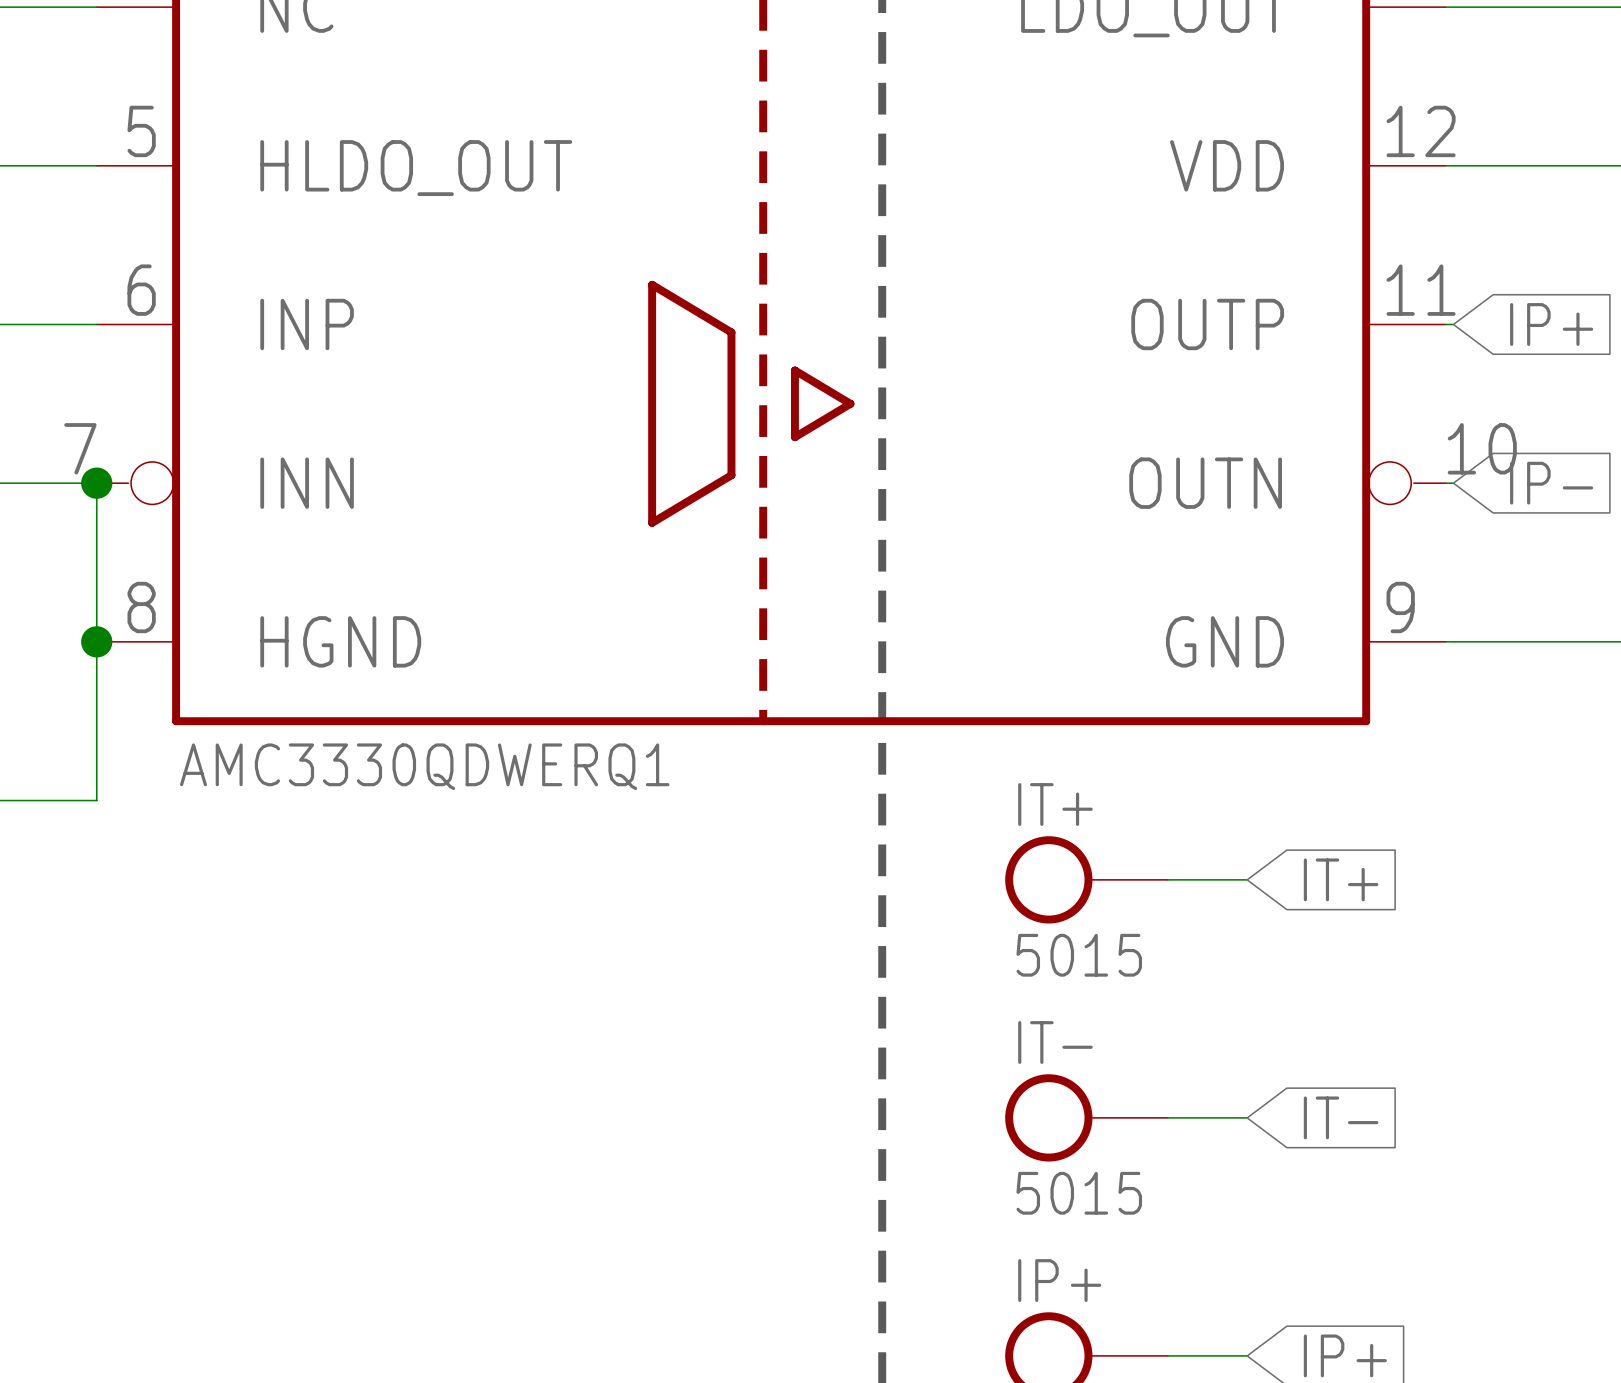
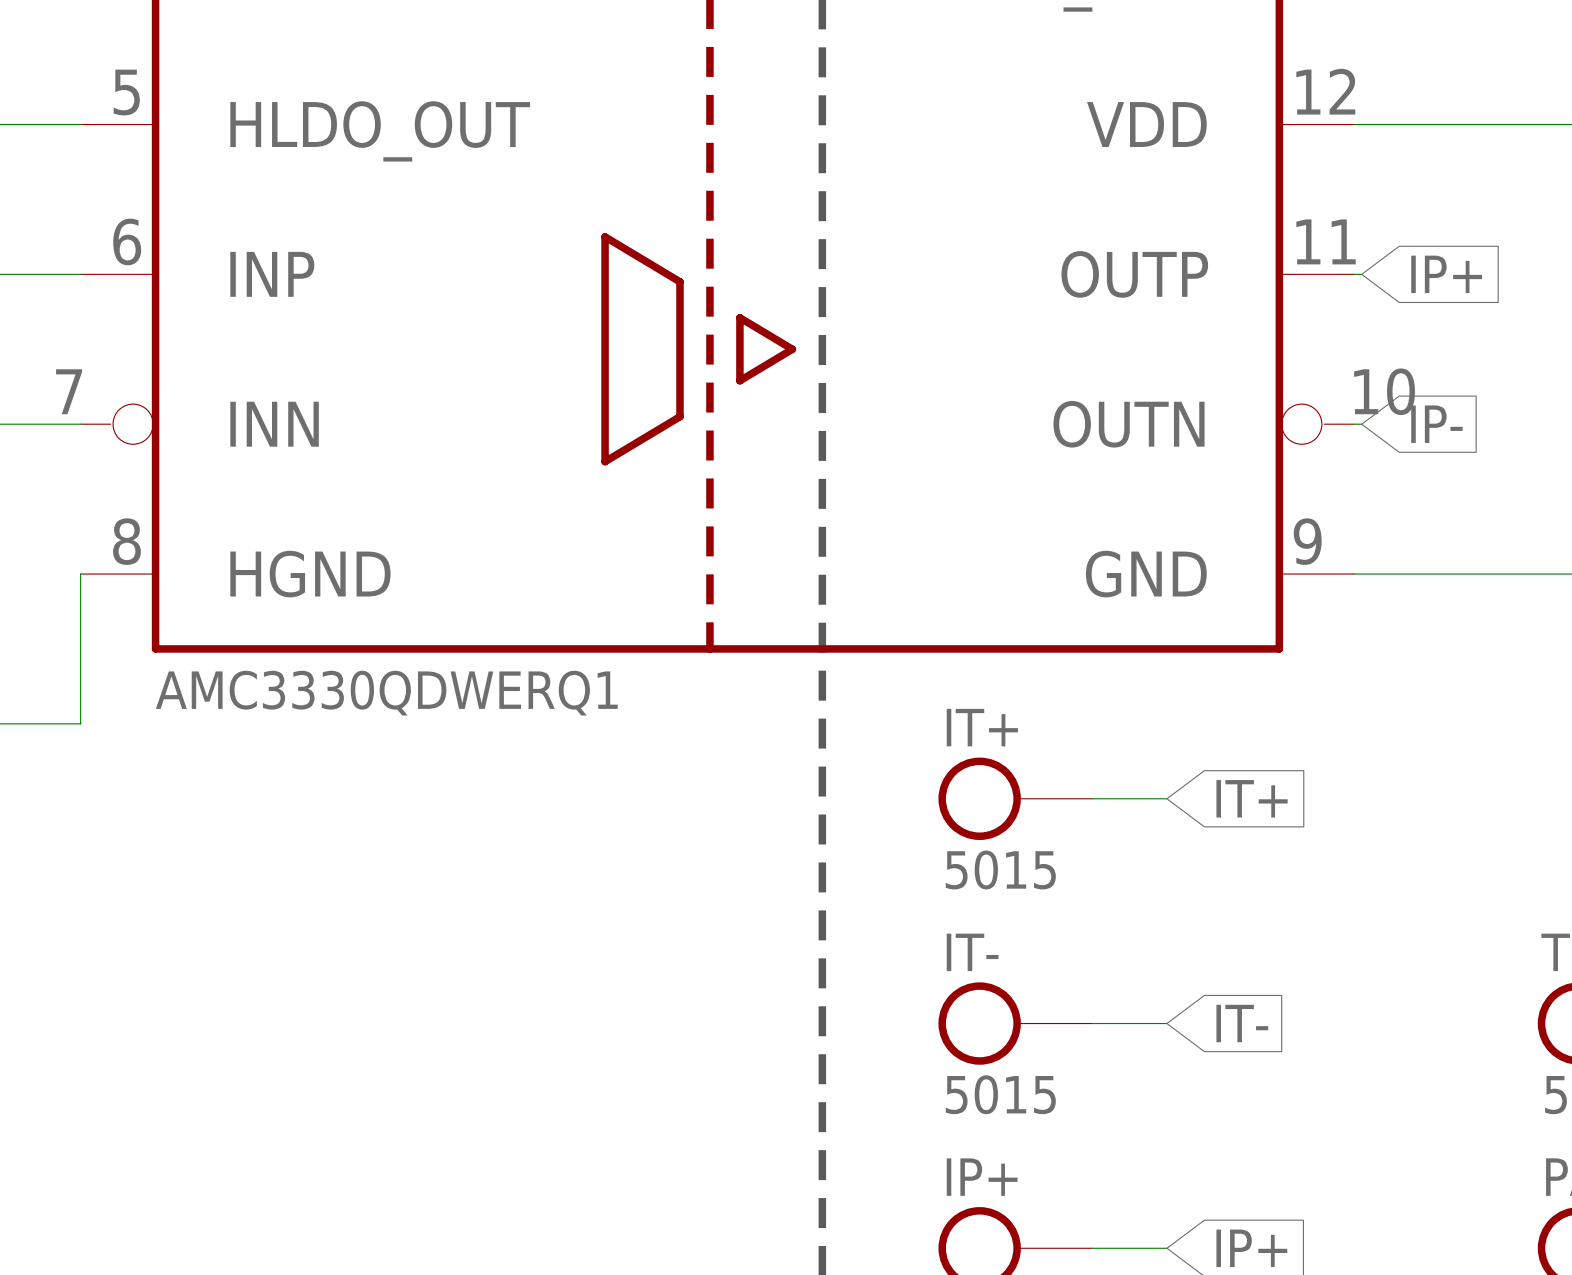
wire: (96, 483) (96, 641) -> none
junction: (96, 483) -> none
junction: (96, 641) -> none

